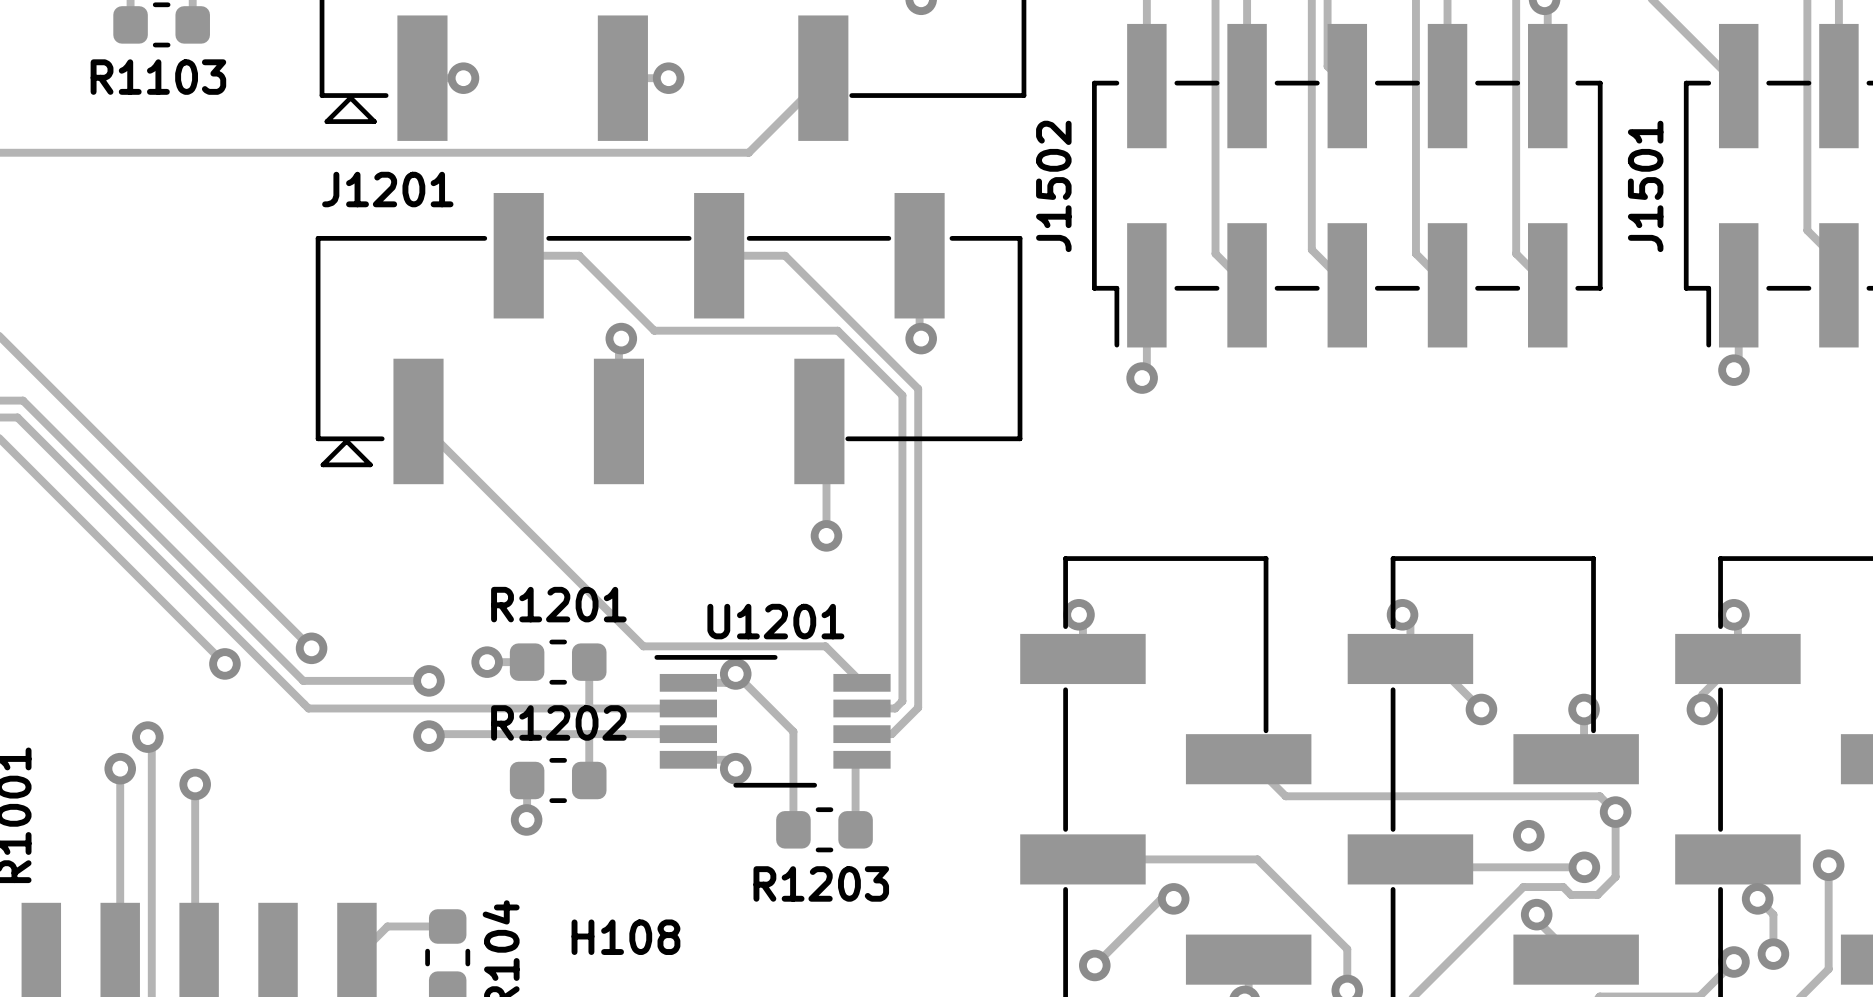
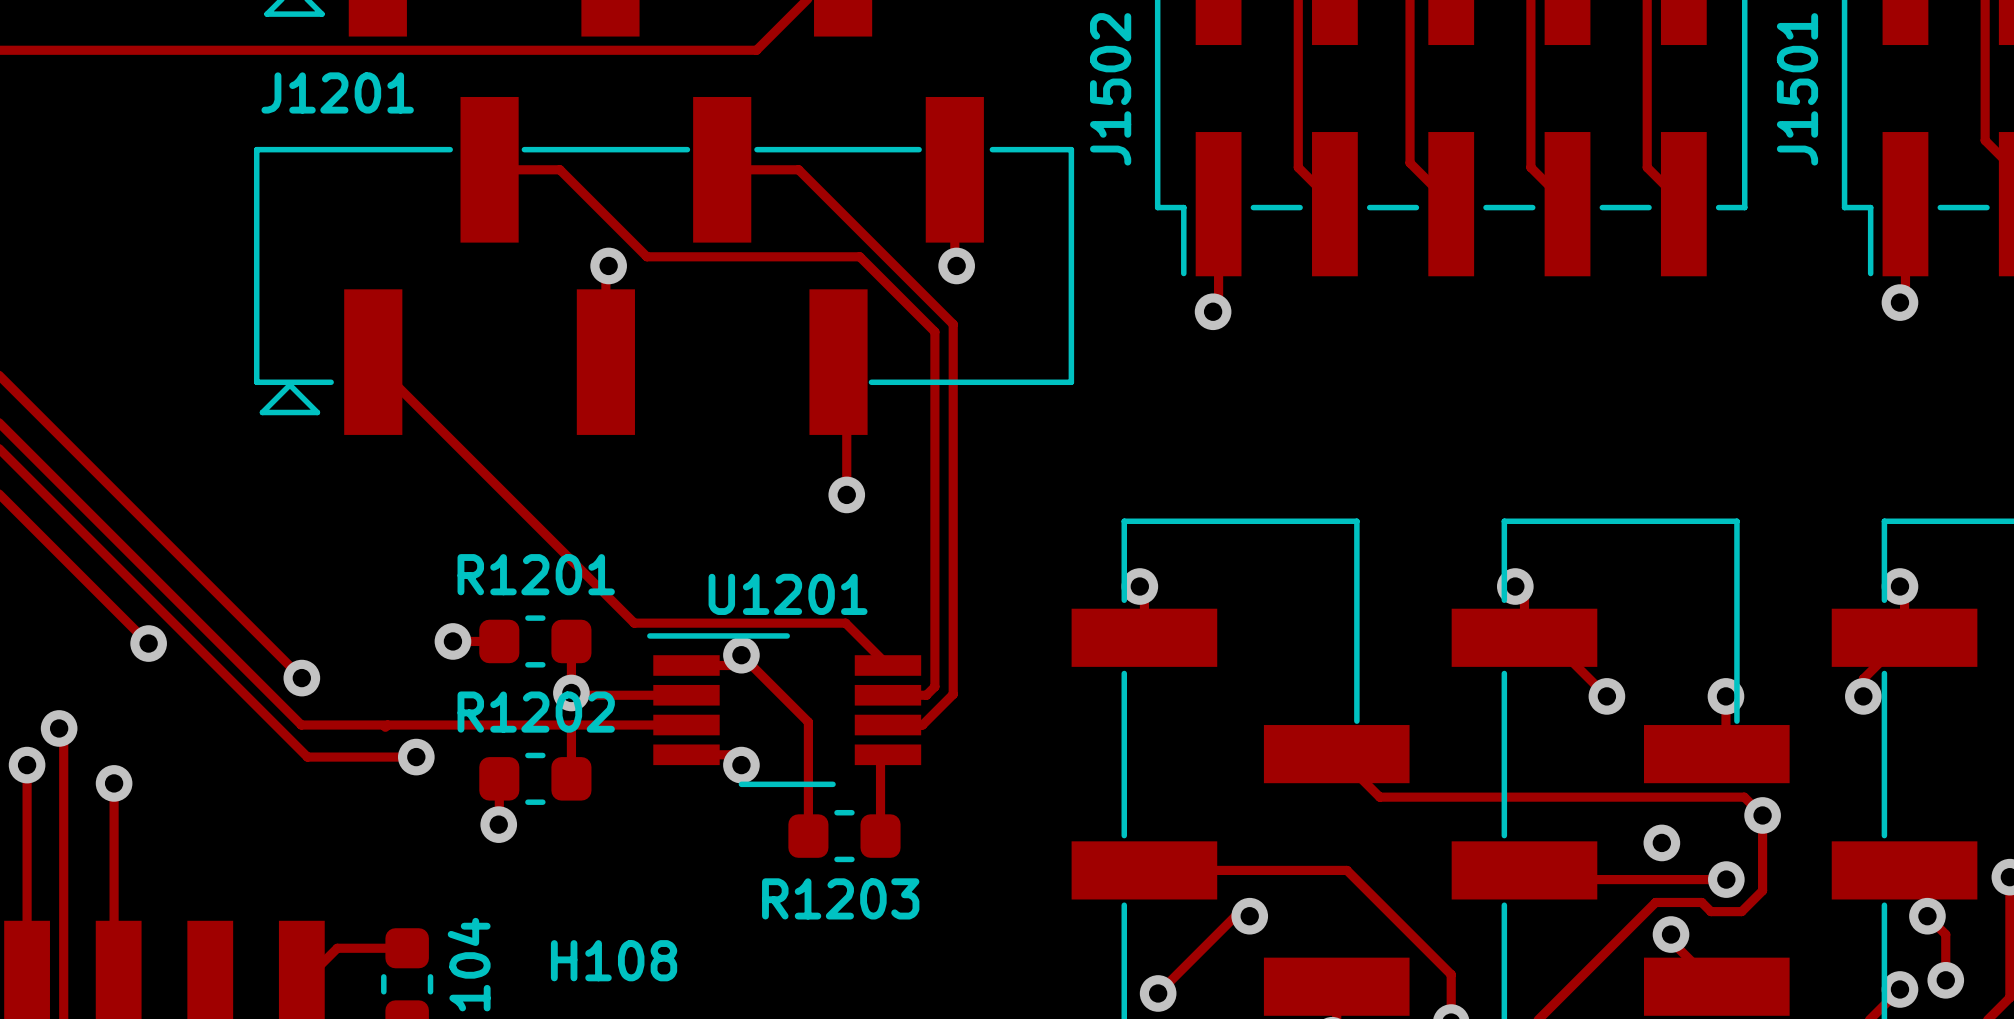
track: none -> (249, 625) (301, 678)
via: (311, 648) -> none
track: (303, 680) (428, 680) -> (239, 663) (301, 725) (387, 725)
via: (428, 680) -> none
via: none -> (301, 678)
via: none -> (571, 692)
track: (308, 708) (590, 708) -> (245, 695) (307, 757) (416, 757)
via position: (428, 736) -> (416, 757)

